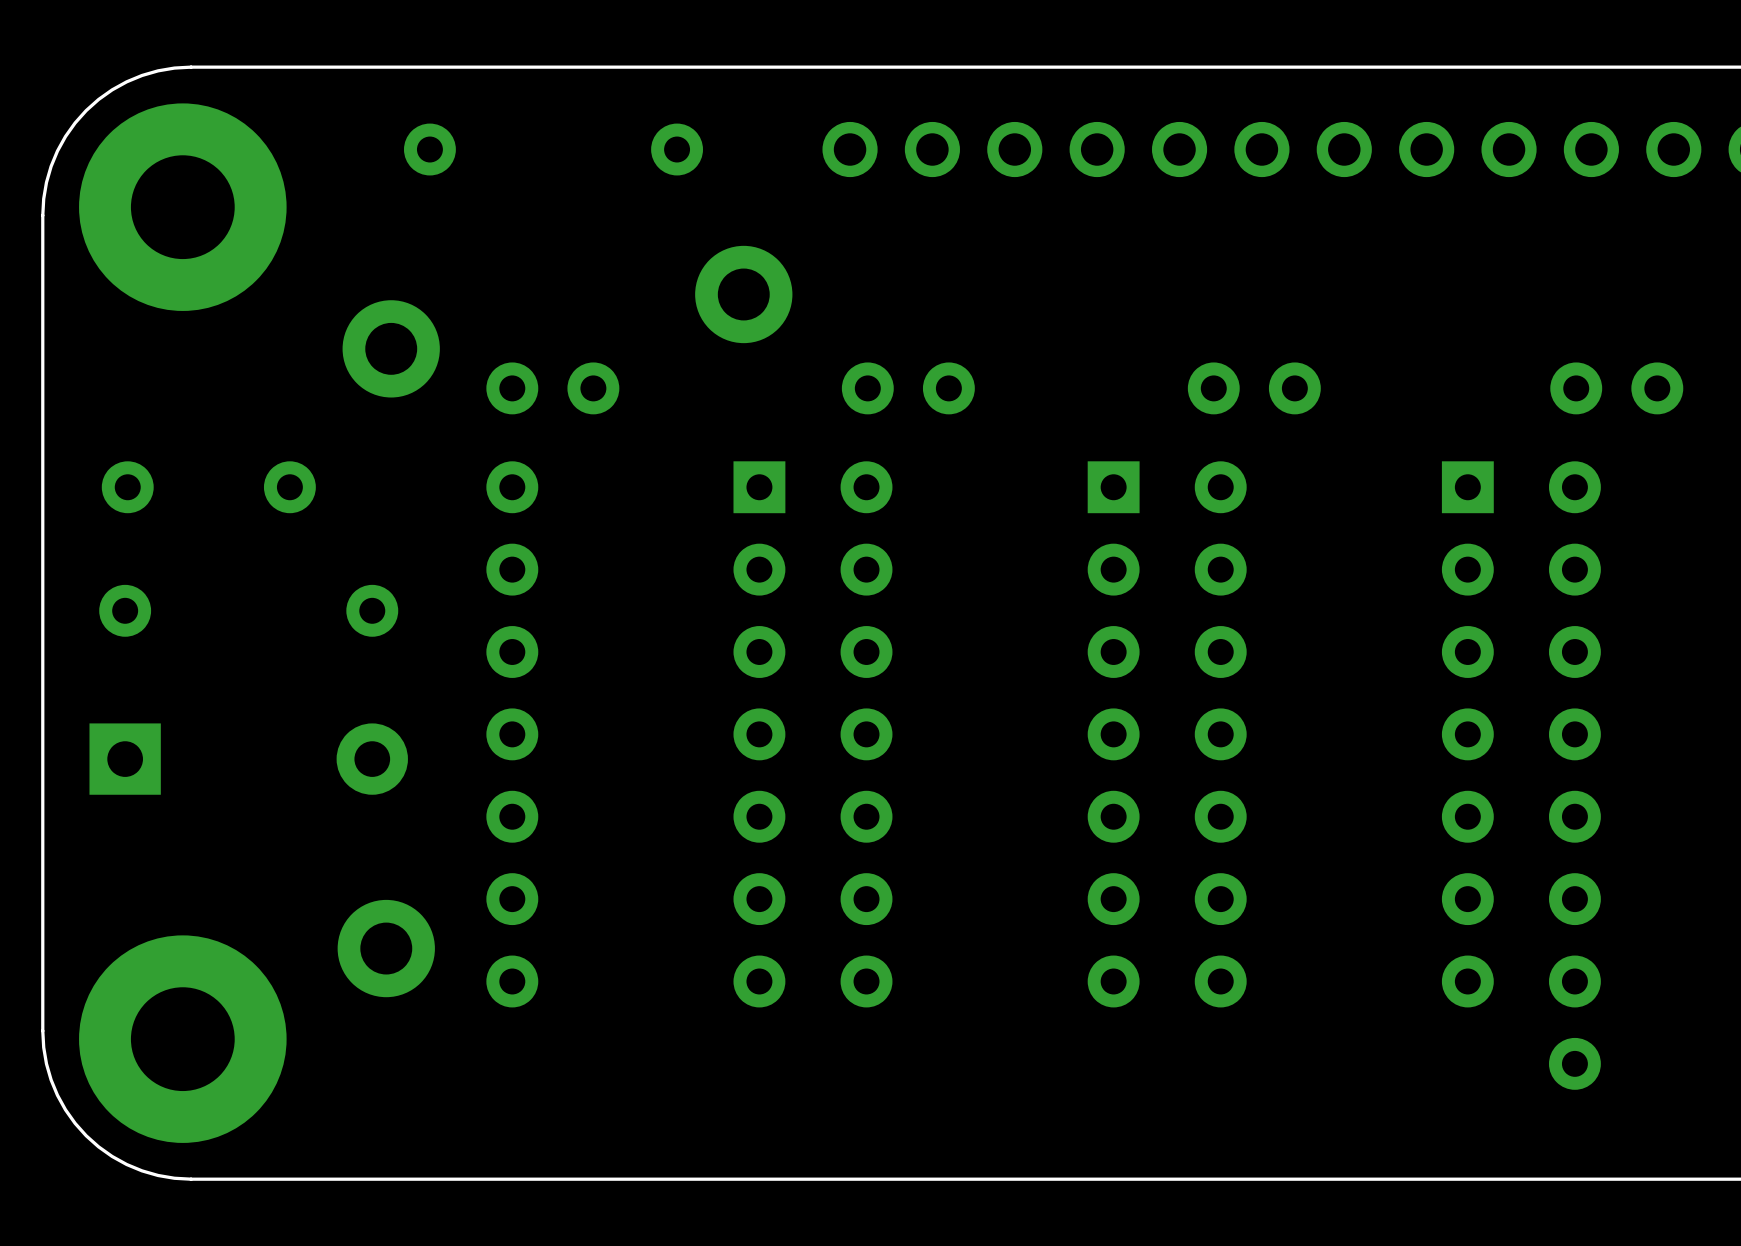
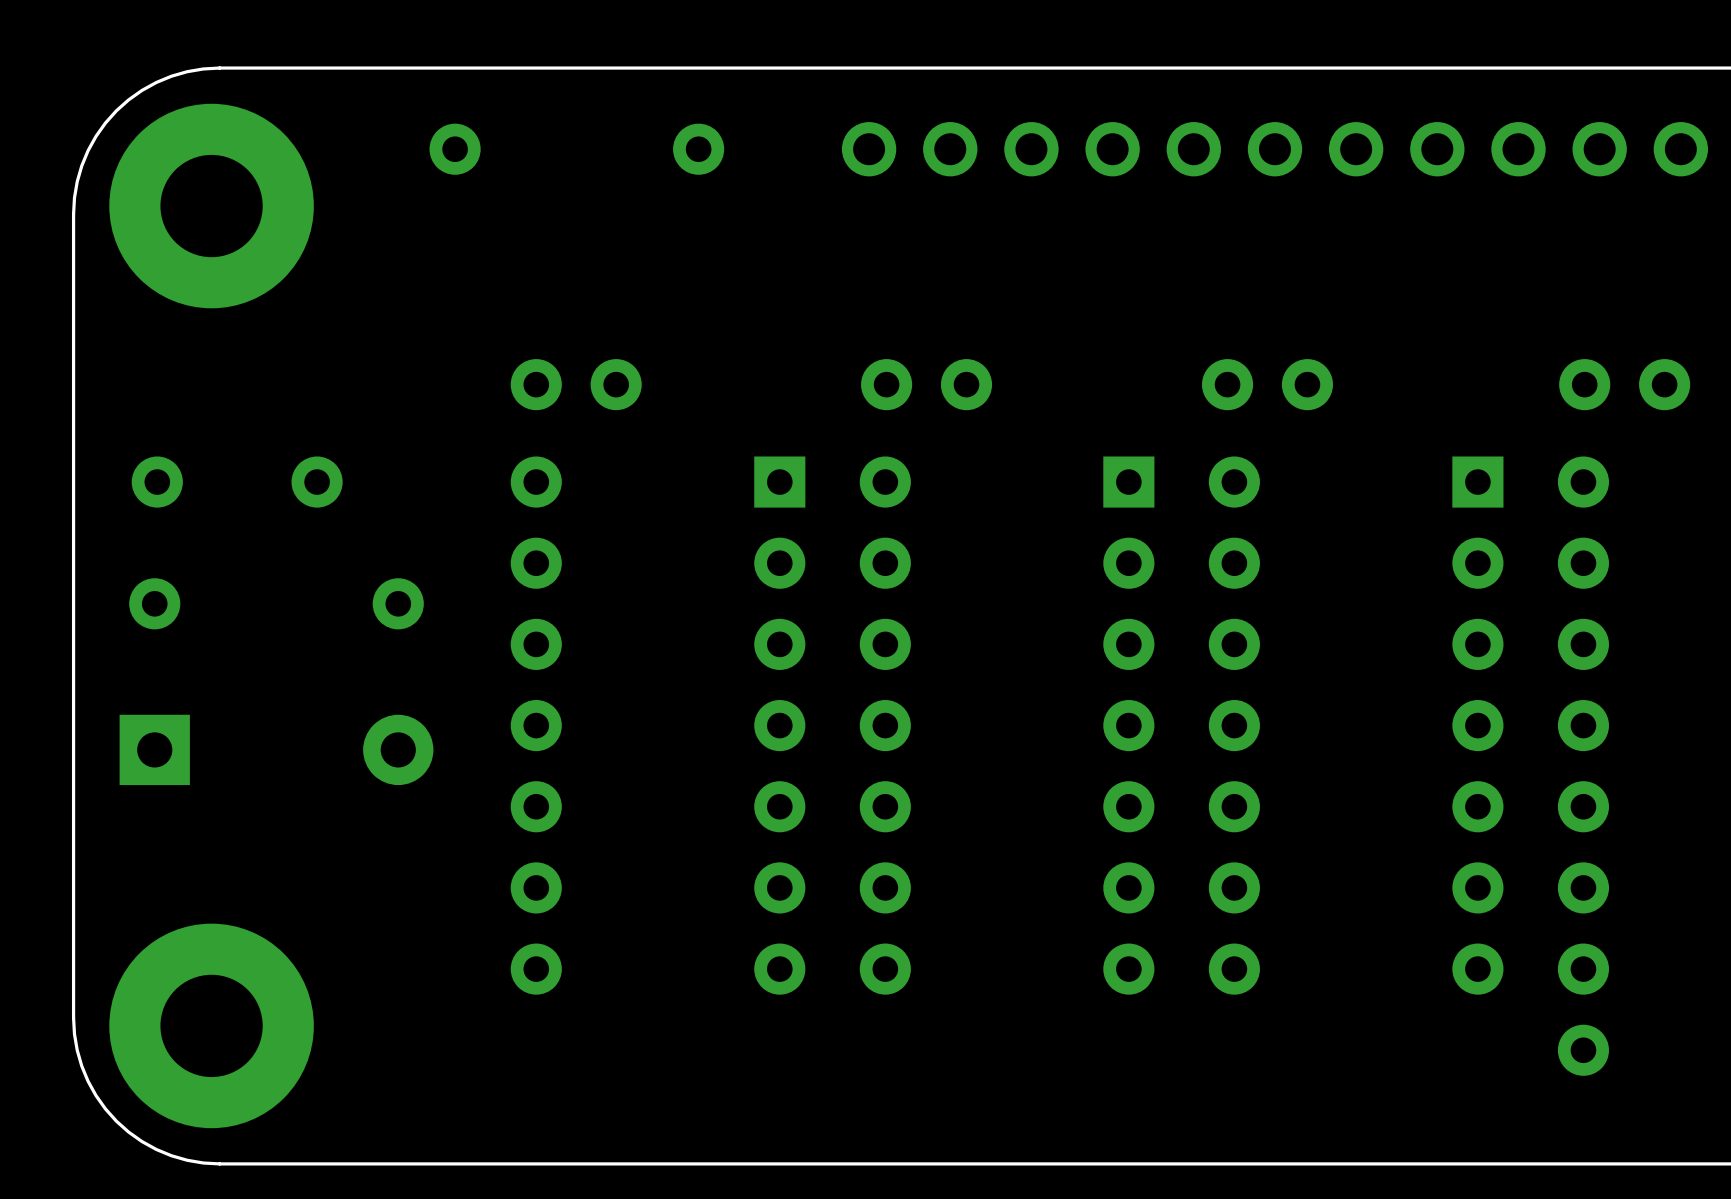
part: (743, 294) -> none
part: (391, 348) -> none
part: (386, 948) -> none

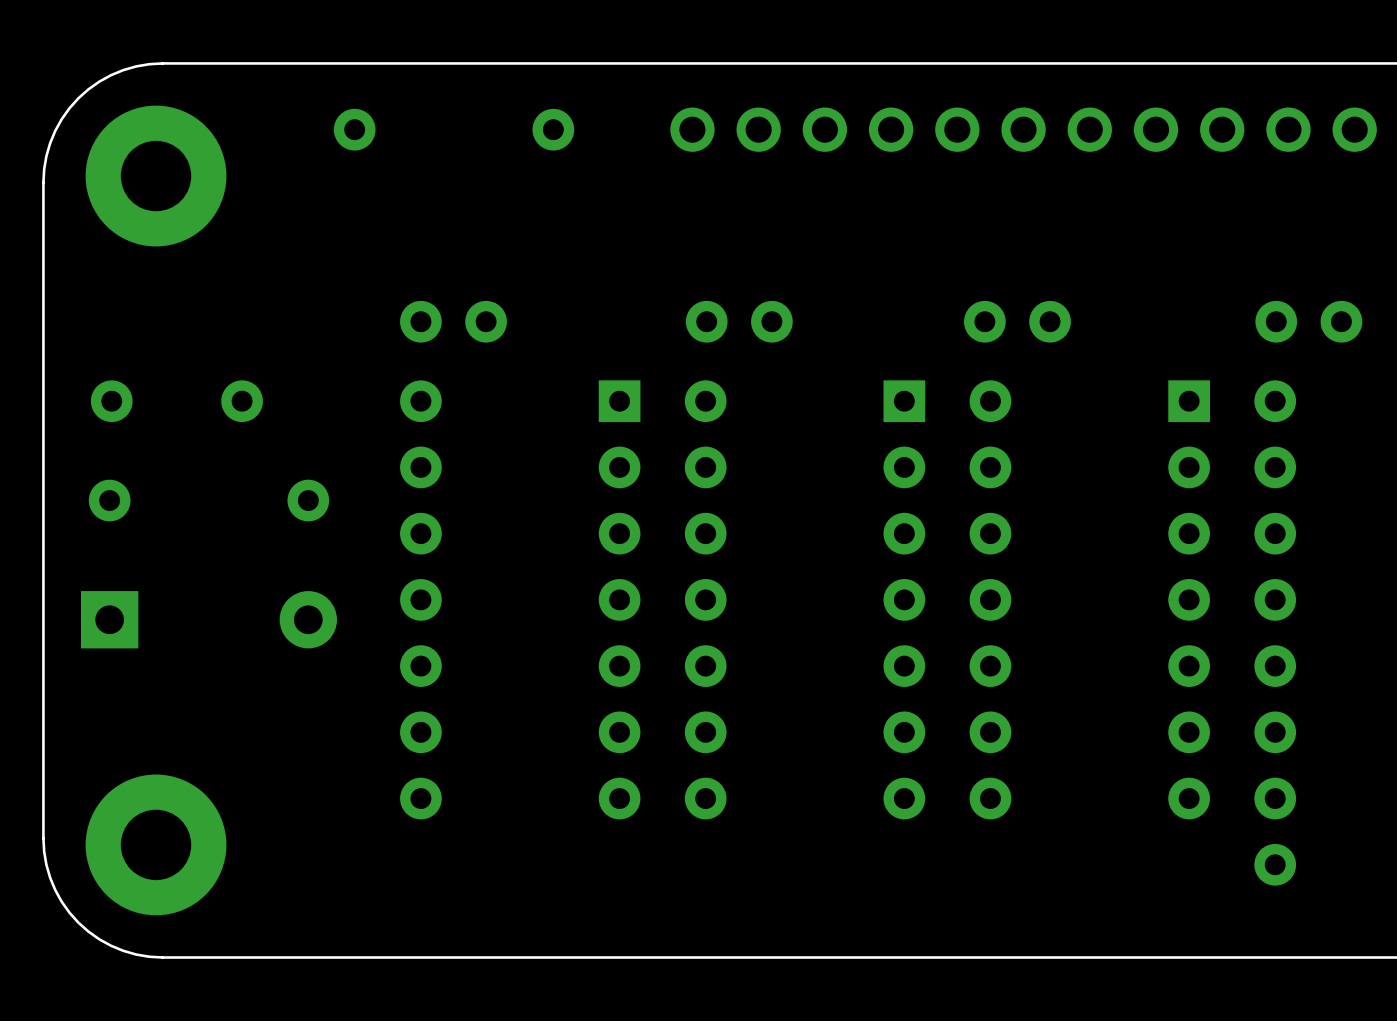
part footprint: [109, 103, 314, 309] -> [85, 105, 227, 247]
part footprint: [109, 923, 314, 1129] -> [85, 774, 227, 916]

